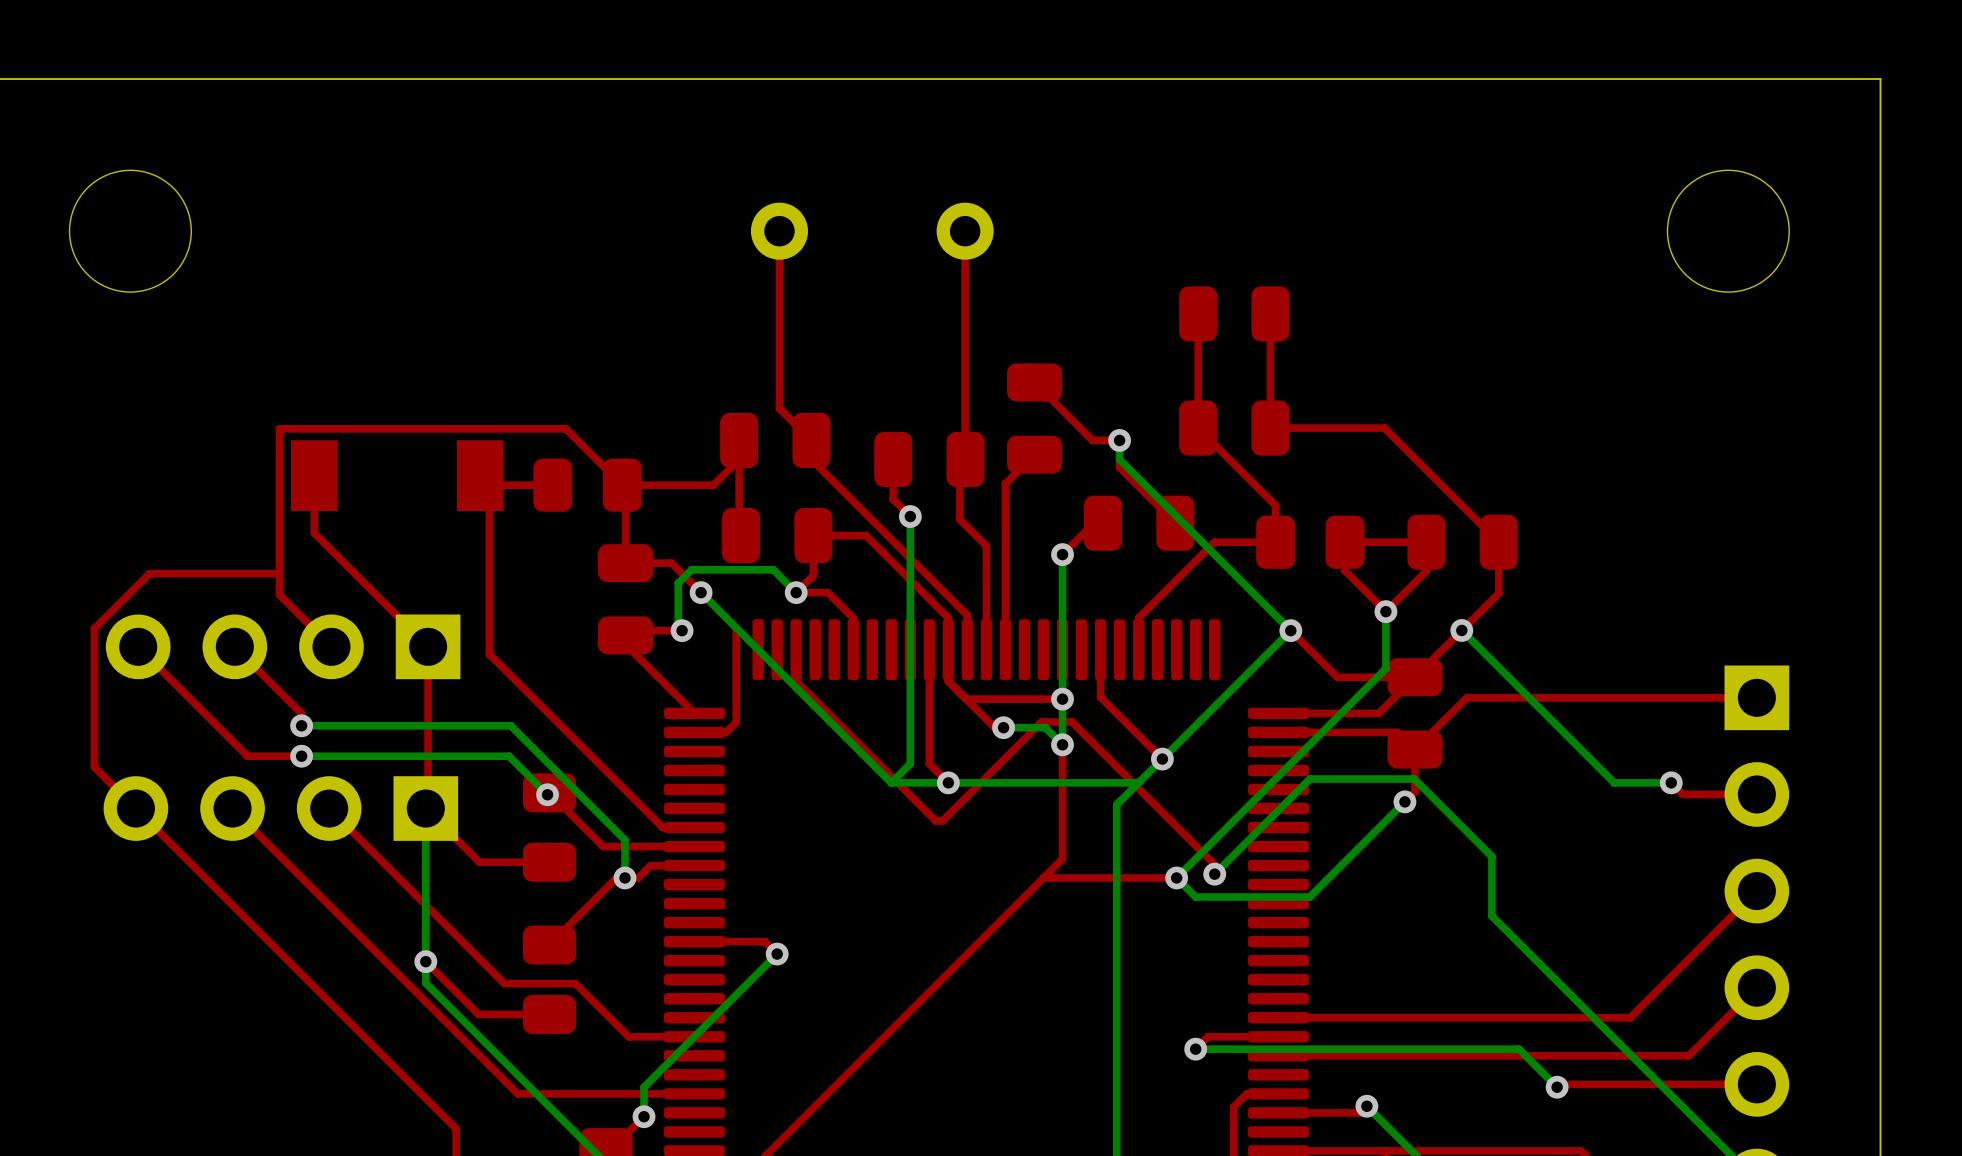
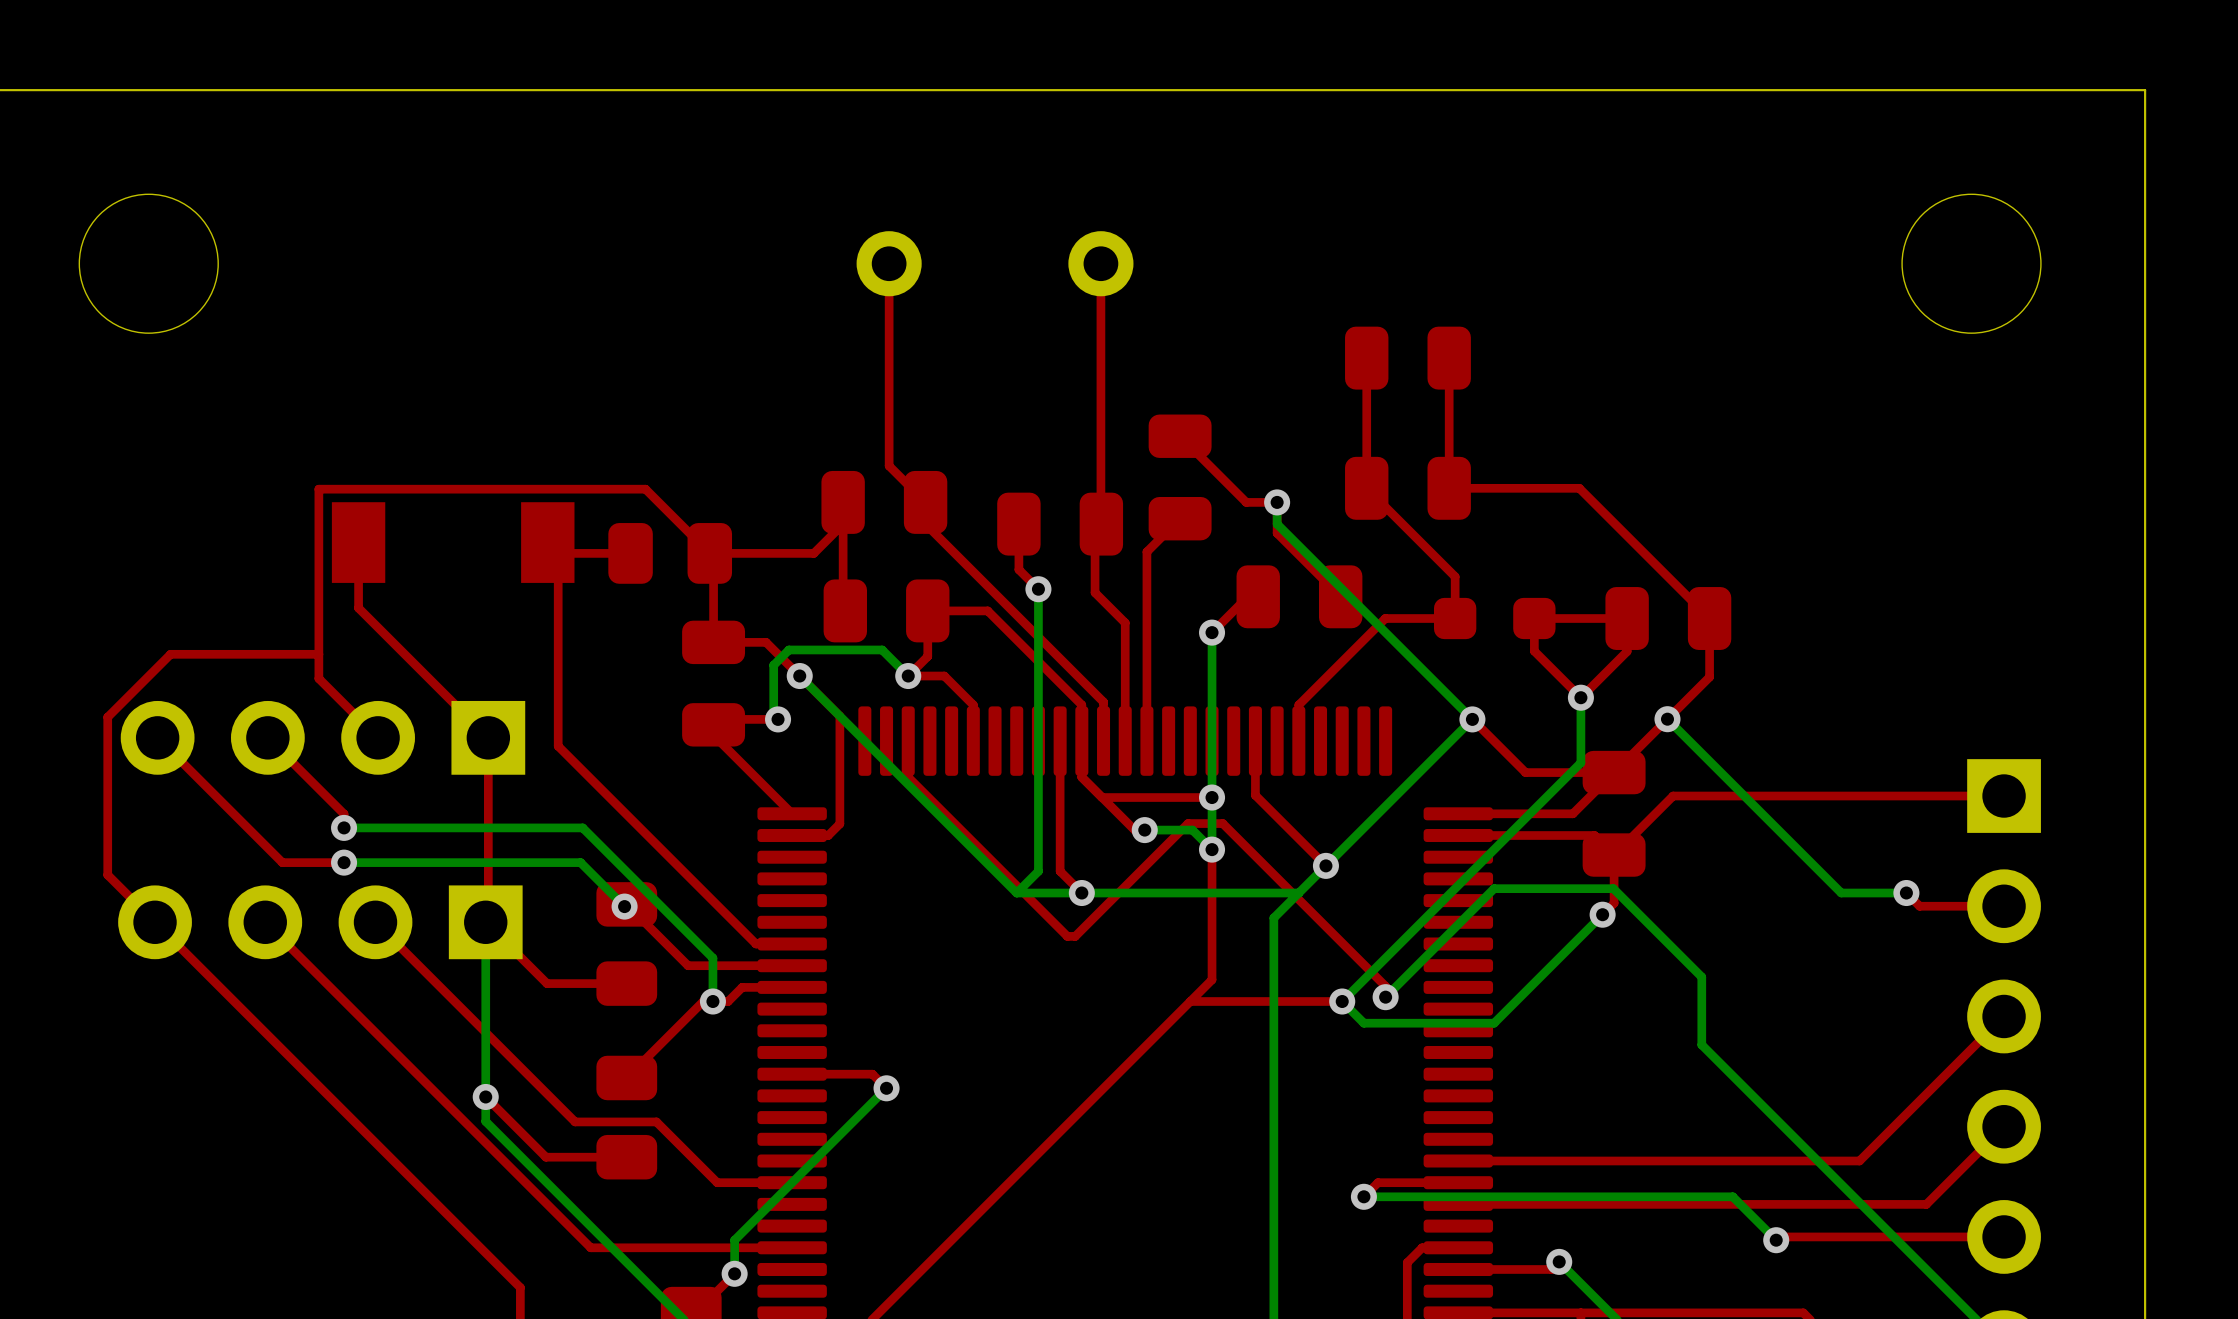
part footprint: [1256, 515, 1365, 569] -> [1433, 597, 1556, 640]

